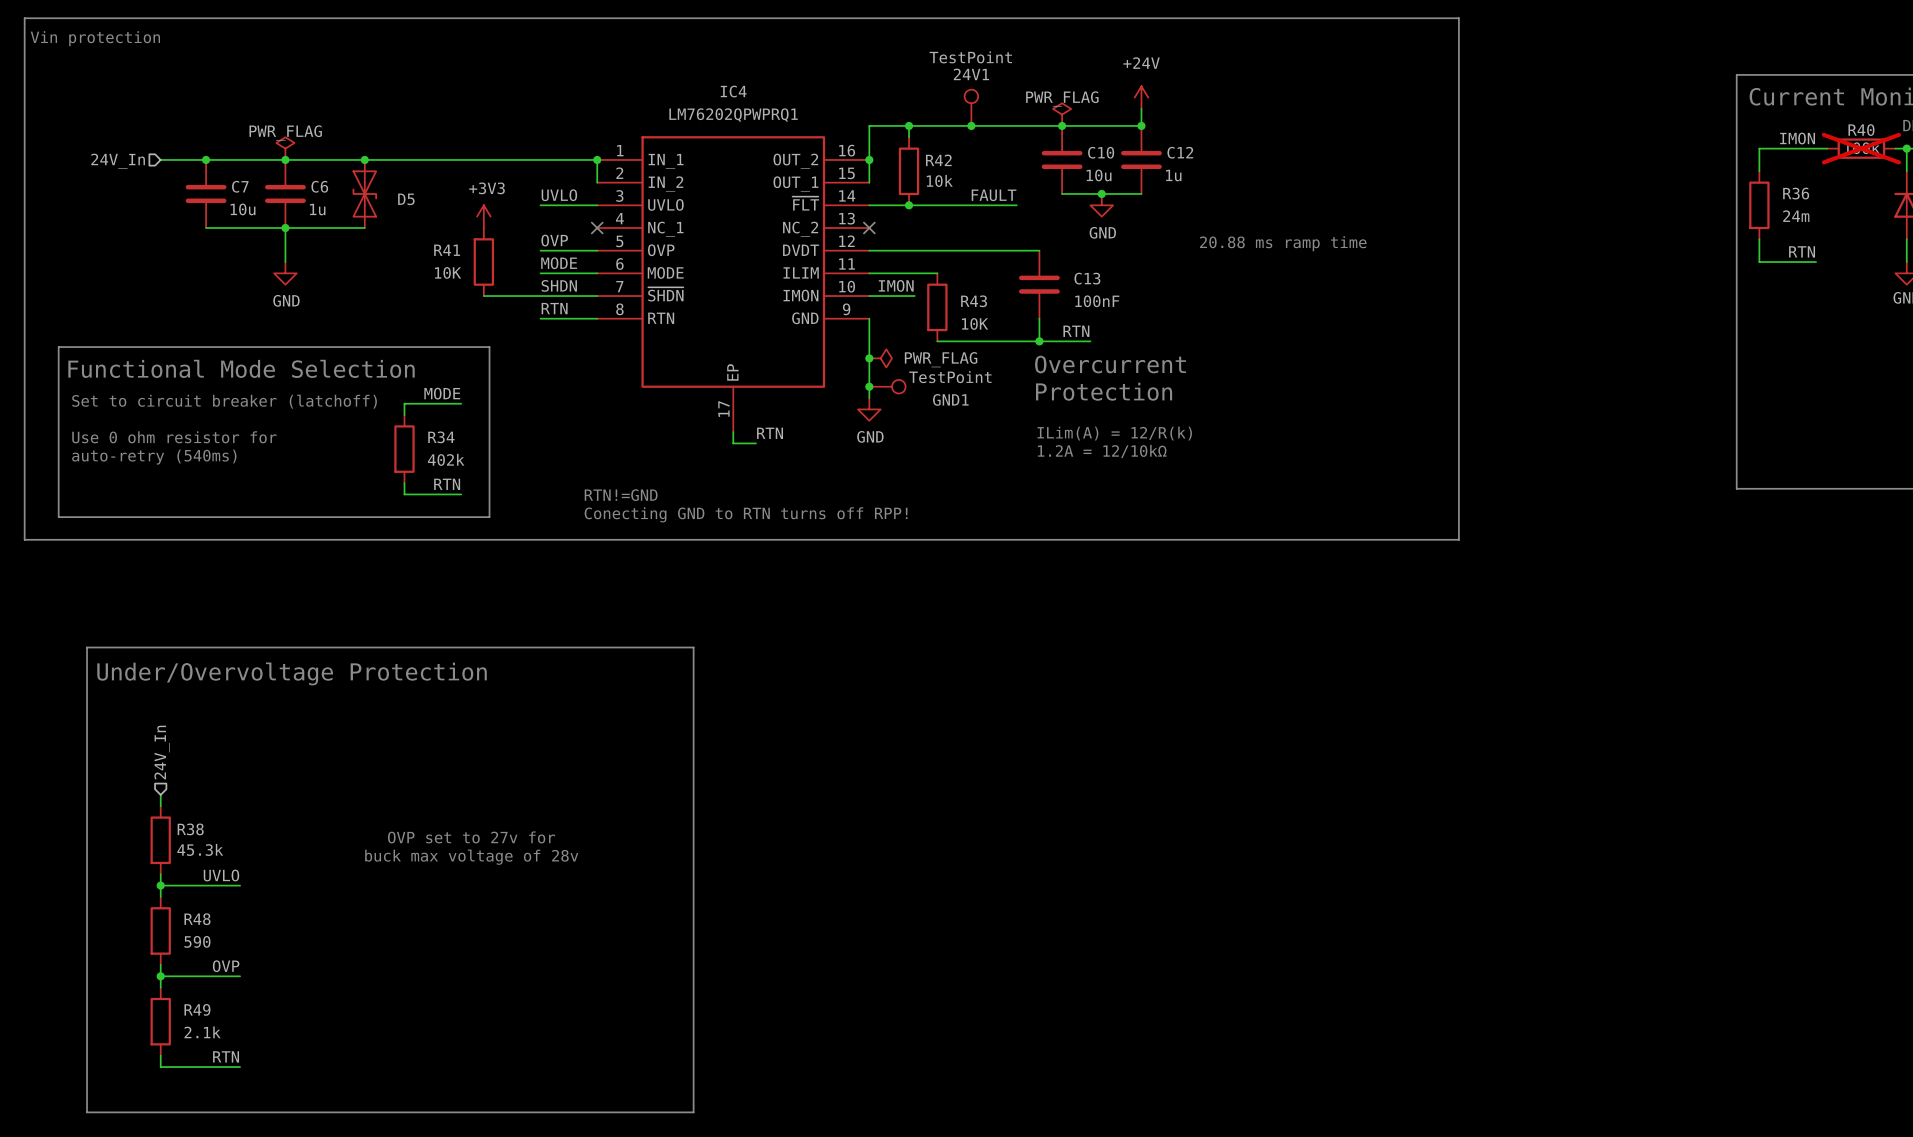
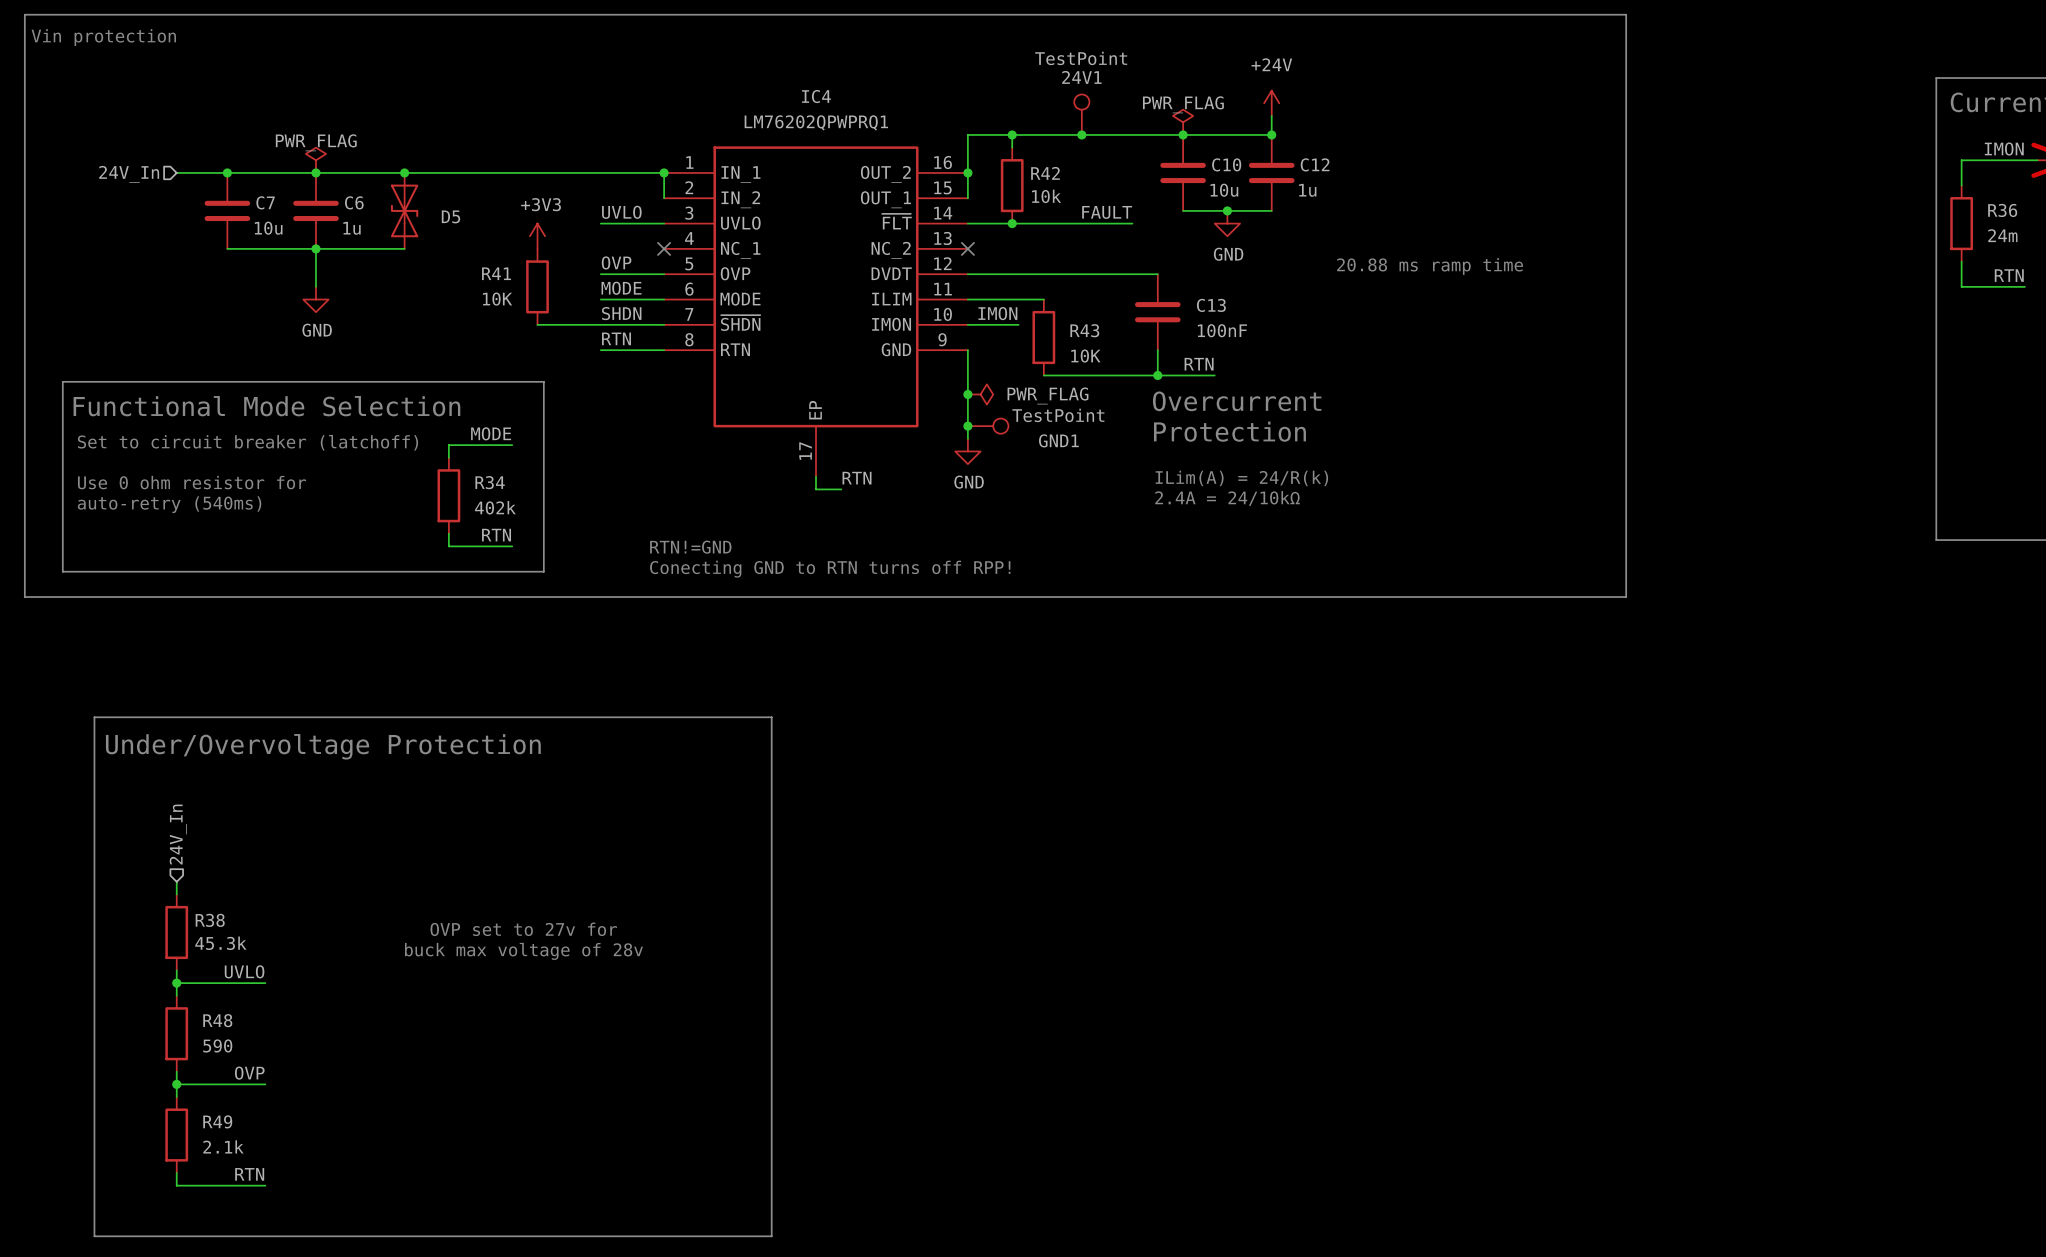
text: ILim(A) = 12/R(k) (1114, 433) -> ILim(A) = 24/R(k) (1241, 478)
text: 1.2A = 12/10kΩ (1102, 451) -> 2.4A = 24/10kΩ (1227, 498)

